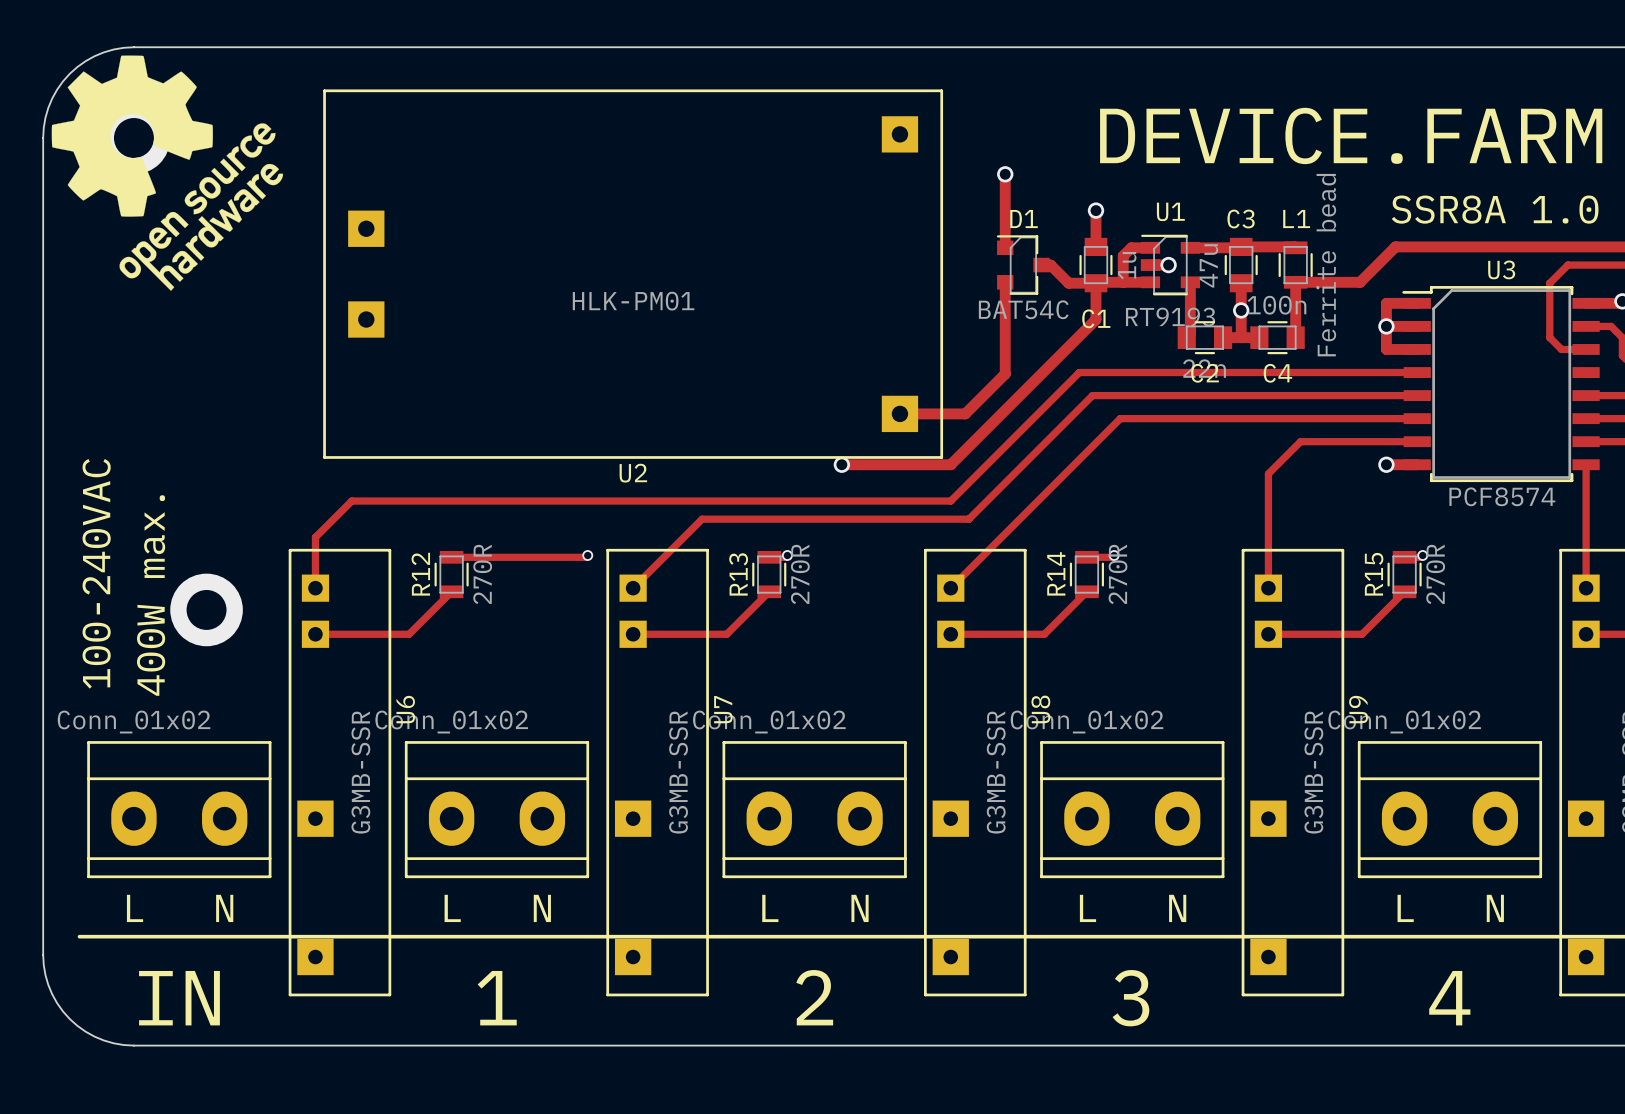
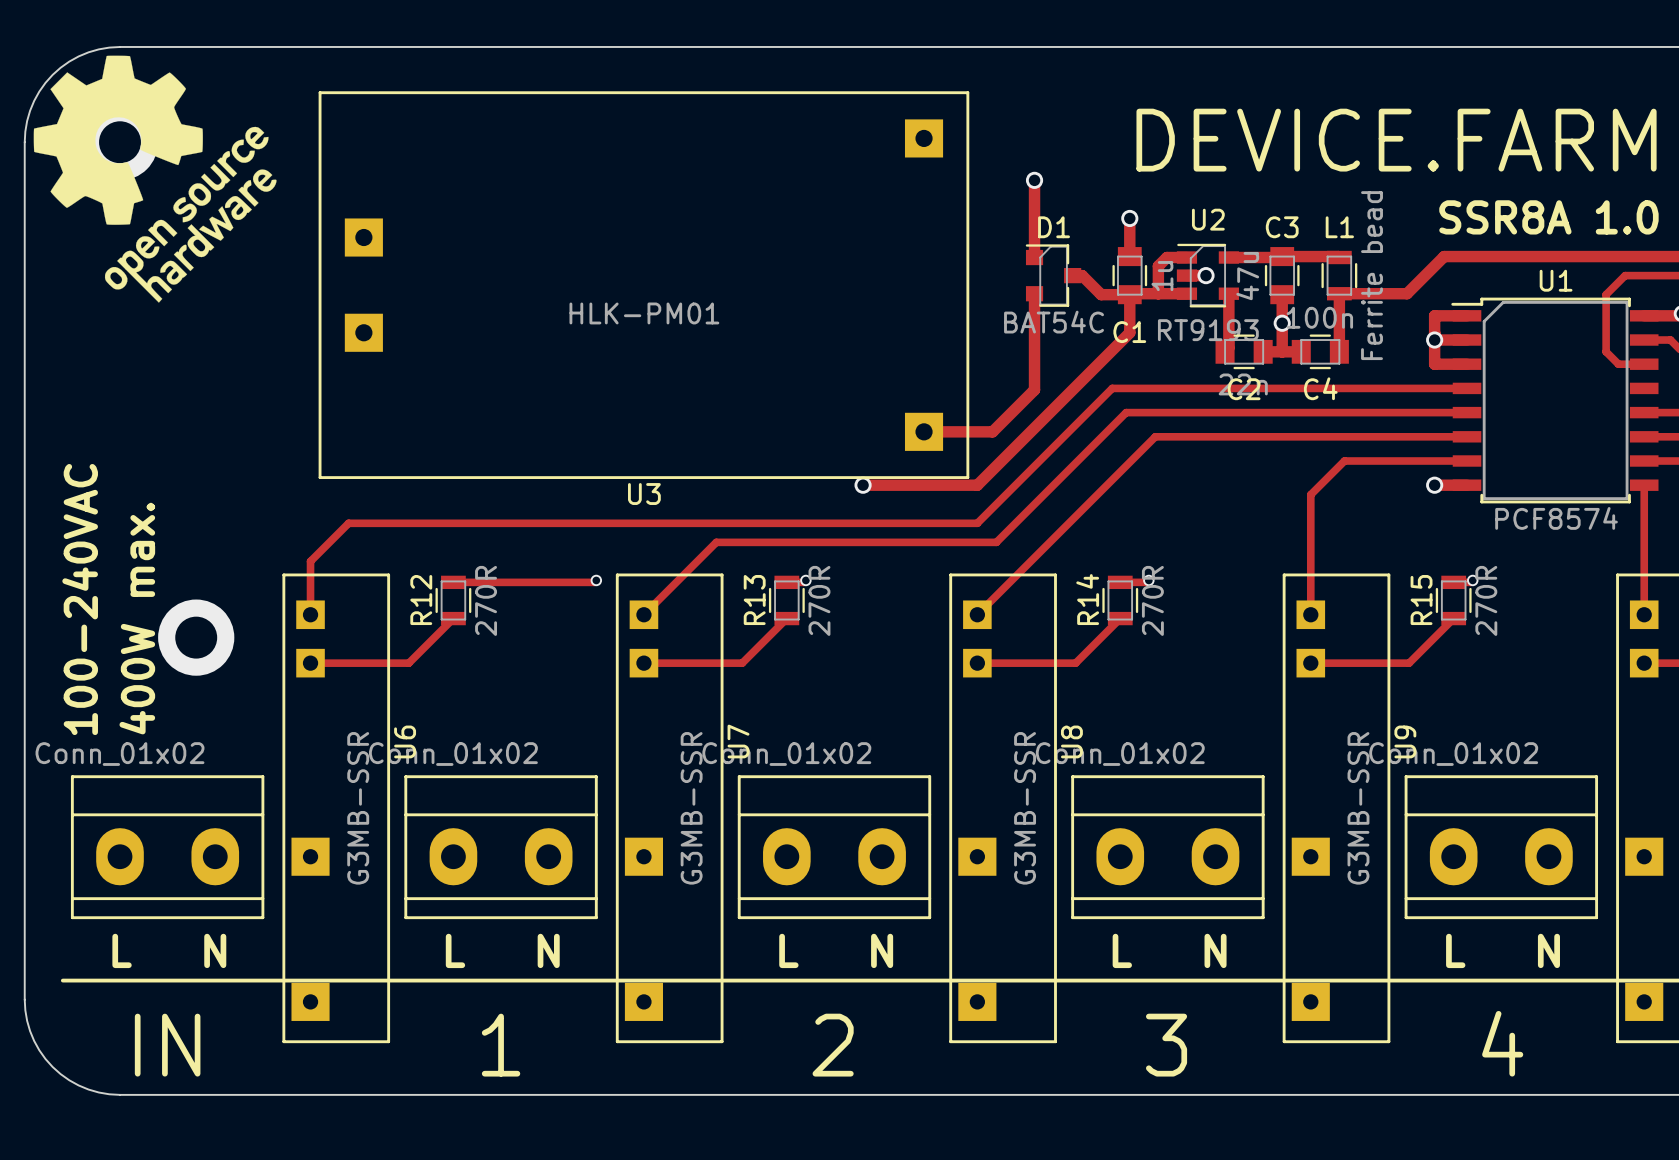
U1 name: U1 (1170, 211) -> U2 (1208, 219)
U3 name: U3 (1501, 269) -> U1 (1556, 280)
U2 name: U2 (633, 473) -> U3 (644, 494)

